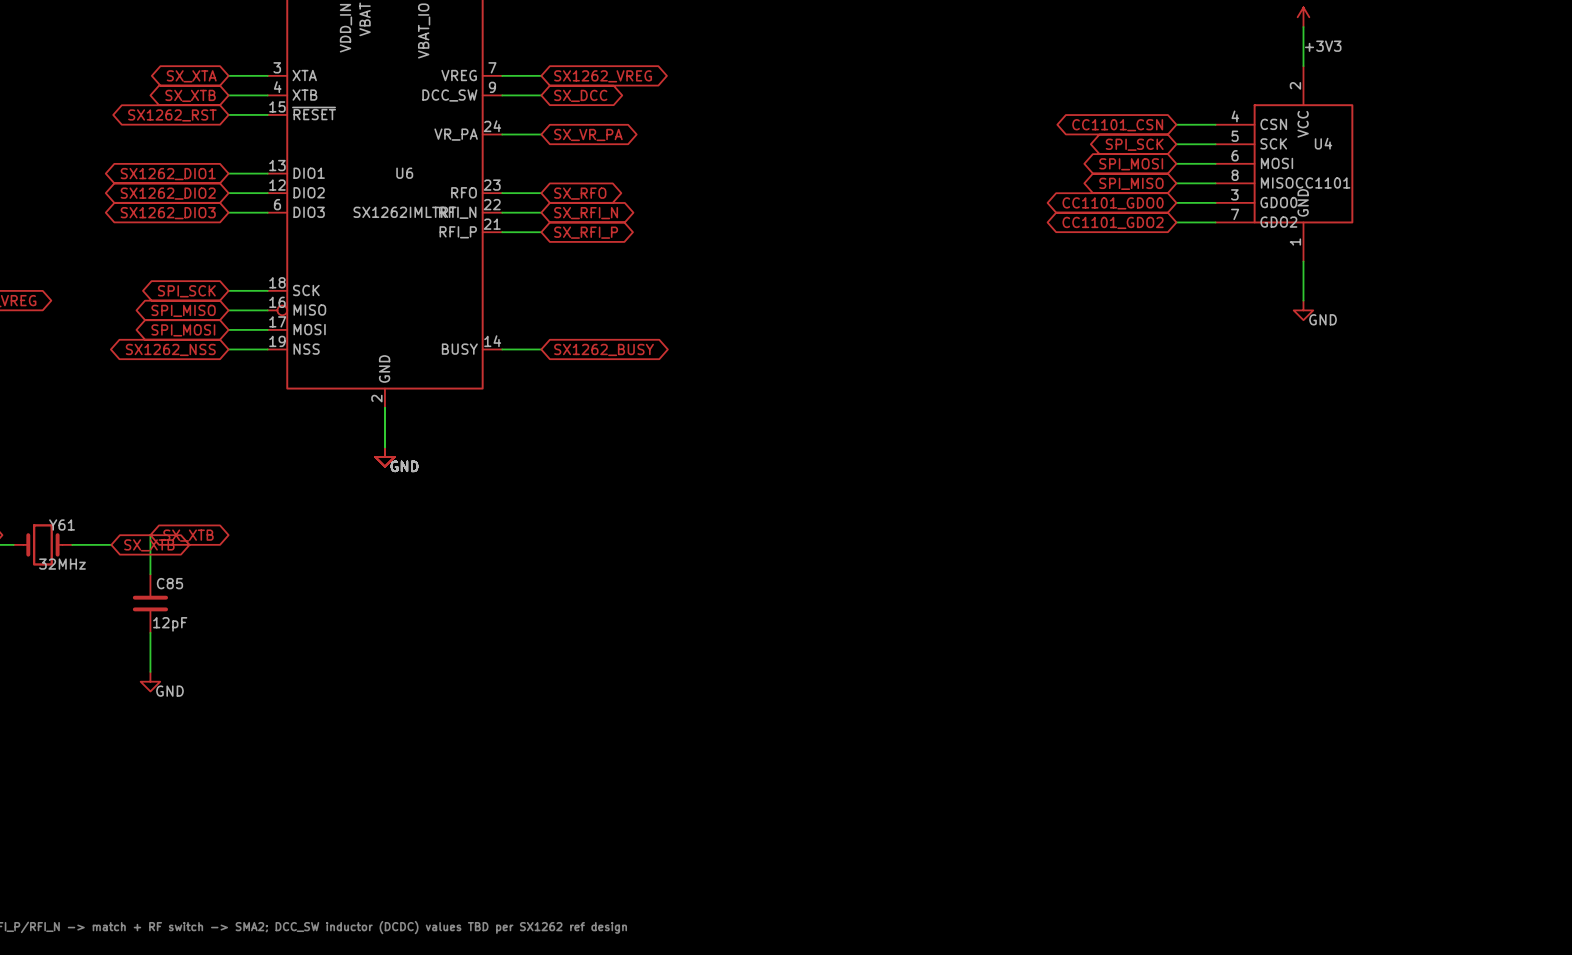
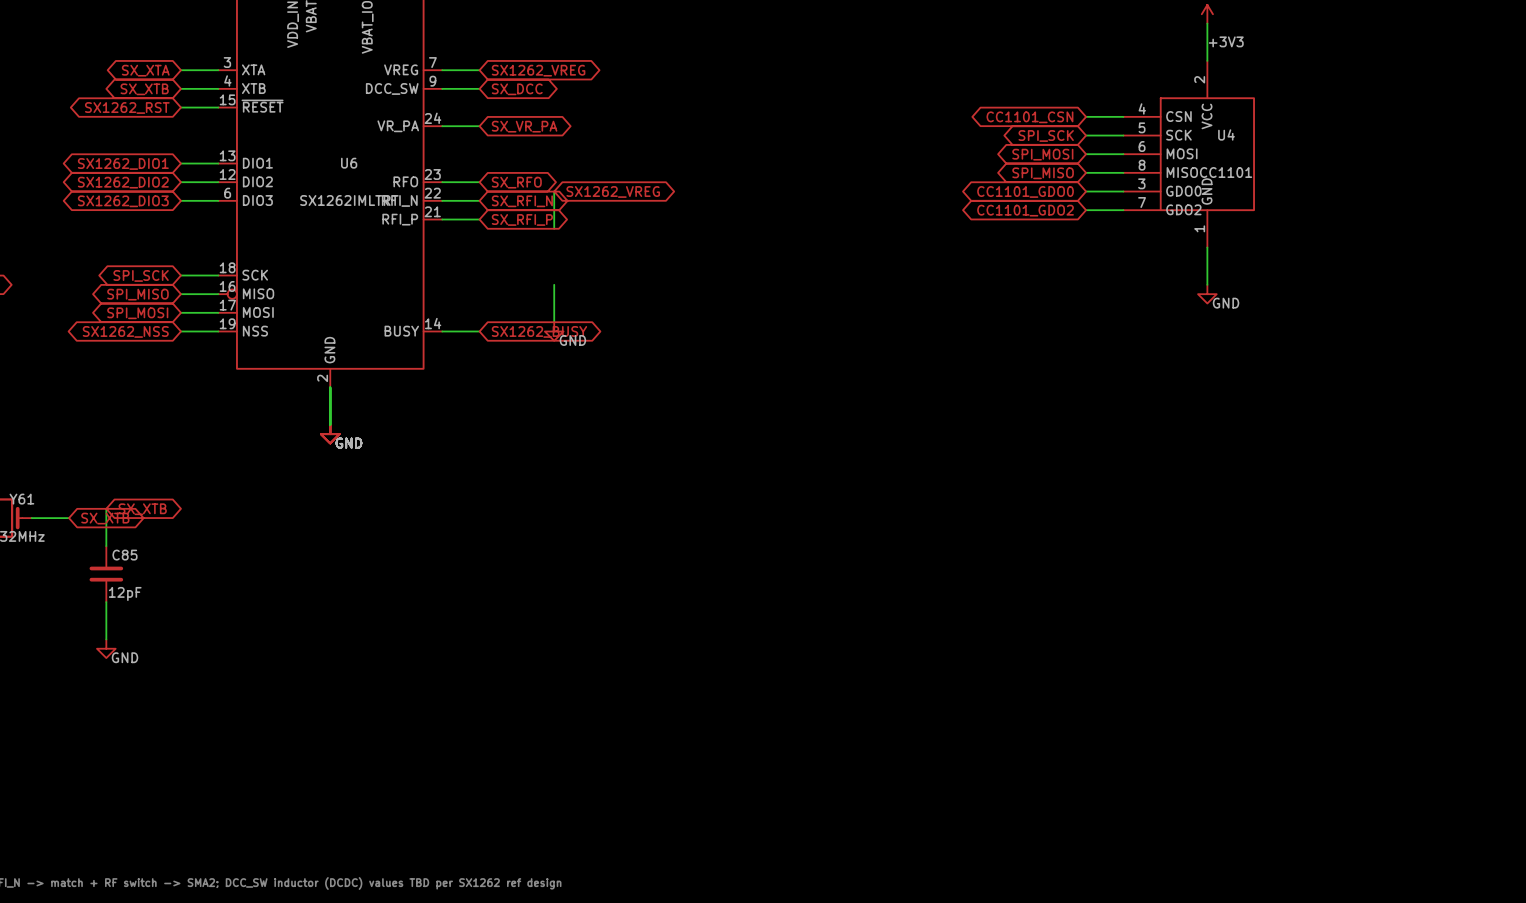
wire: none -> (554, 191) (554, 228)
global label: none -> SX1262_VREG (613, 191)
wire: none -> (554, 284) (554, 322)
power symbol: none -> GND (554, 331)

